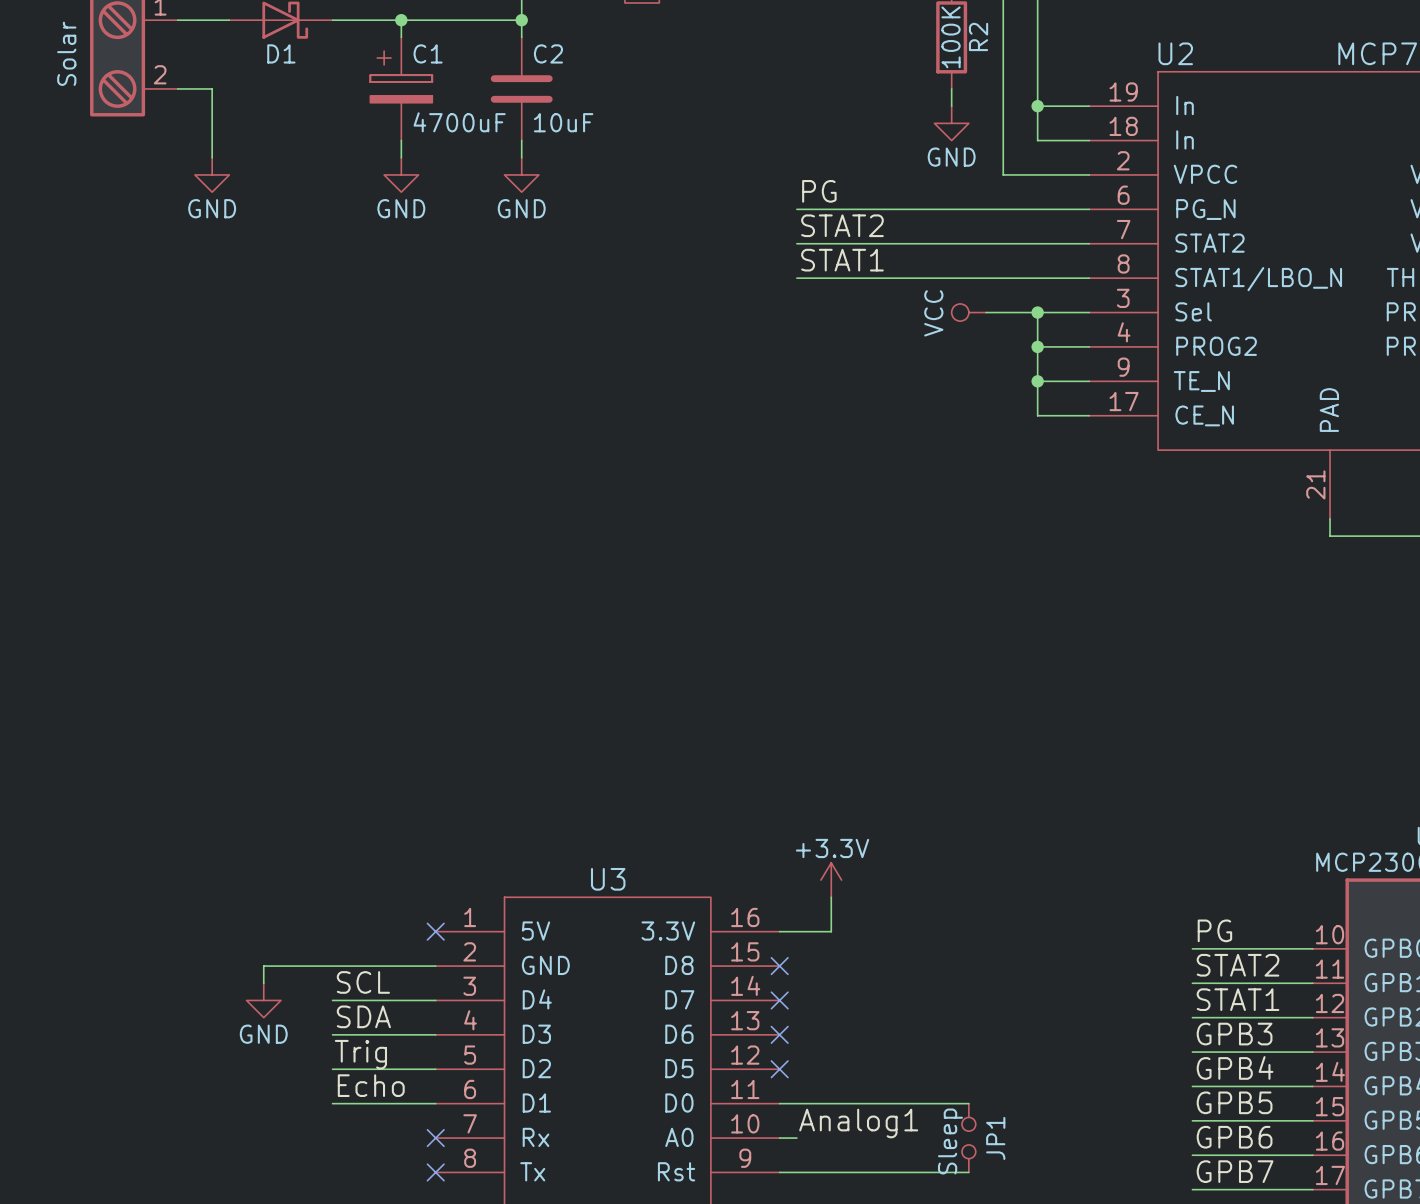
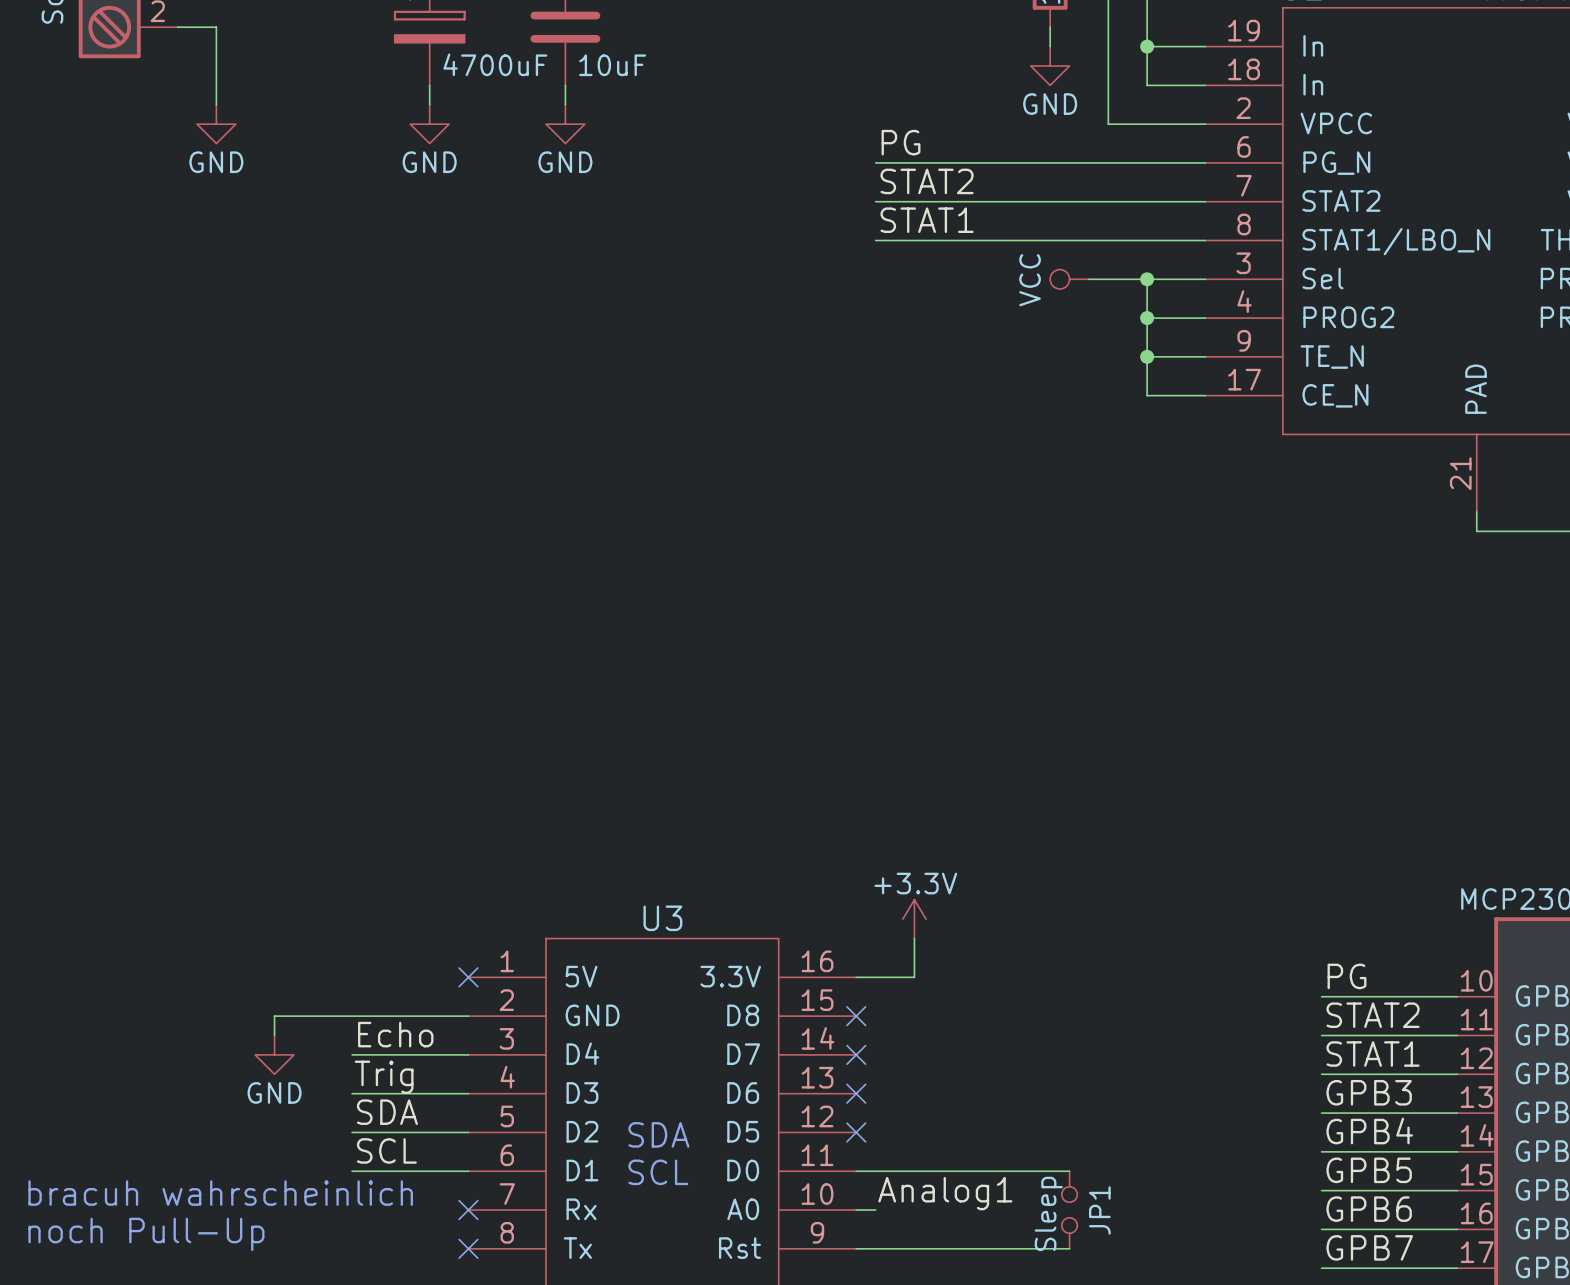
label: SCL (363, 982) -> Echo (395, 1034)
label: SDA (363, 1016) -> Trig (384, 1077)
label: Trig (360, 1054) -> SDA (387, 1112)
text: none -> SDA (658, 1134)
label: Echo (371, 1085) -> SCL (386, 1150)
text: none -> SCL (658, 1172)
text: none -> bracuh wahrscheinlich (220, 1193)
text: none -> noch Pull-Up (146, 1234)

